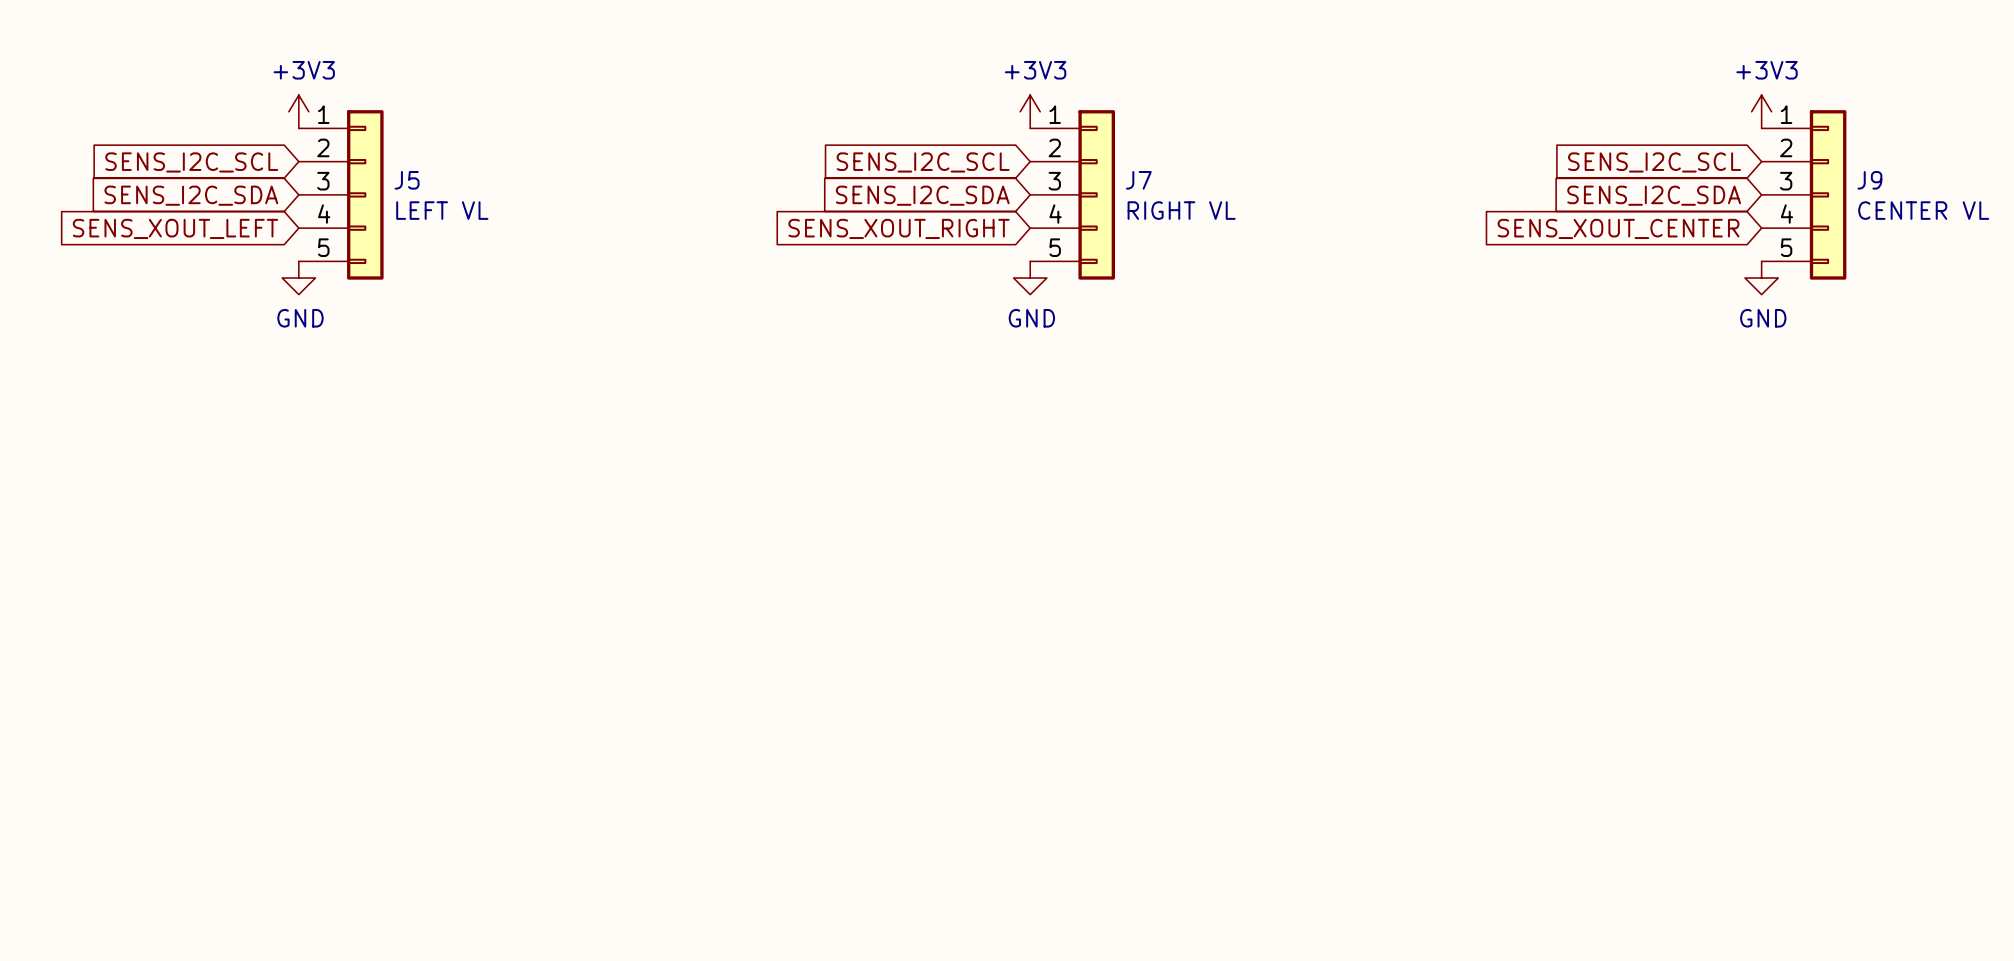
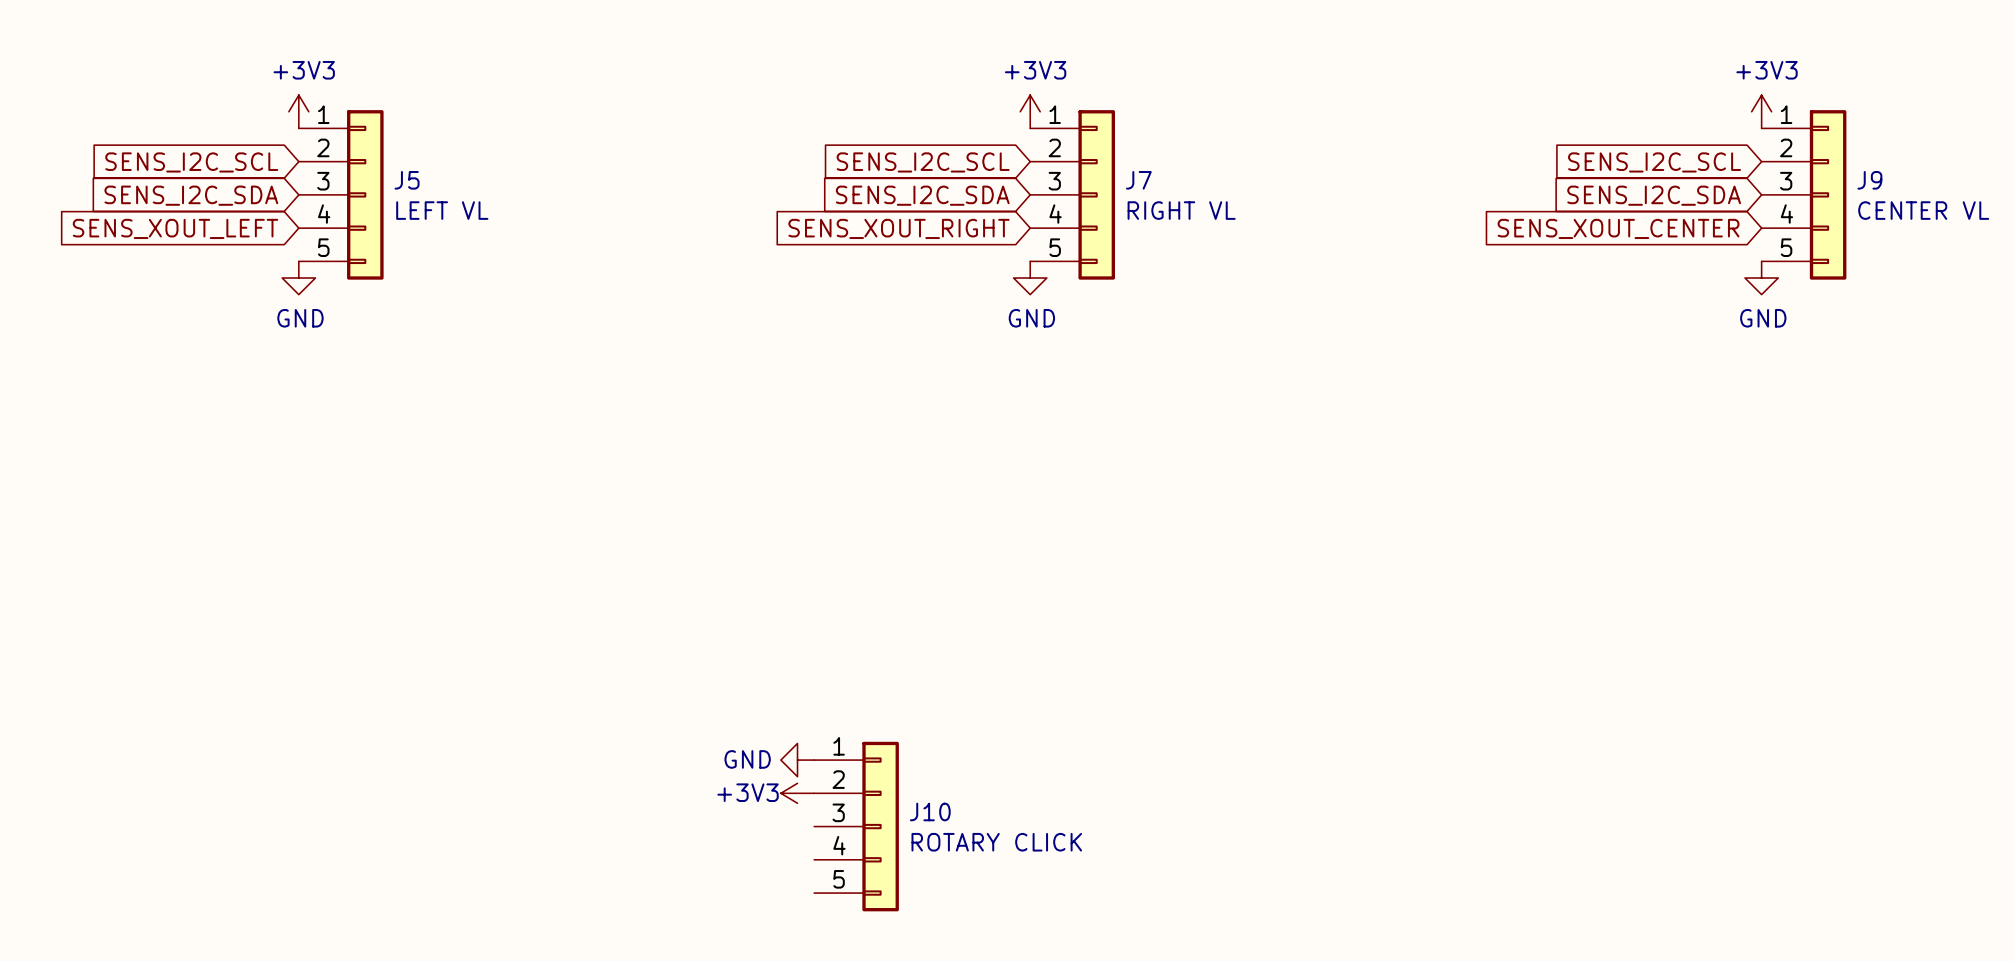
power symbol: none -> GND (797, 760)
power symbol: none -> +3V3 (797, 793)
J10: none -> ROTARY CLICK (856, 826)

